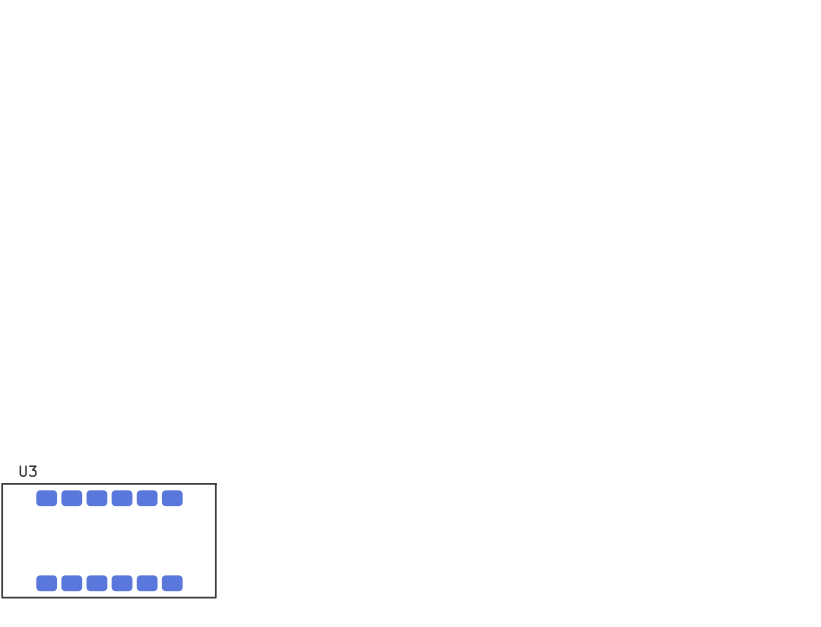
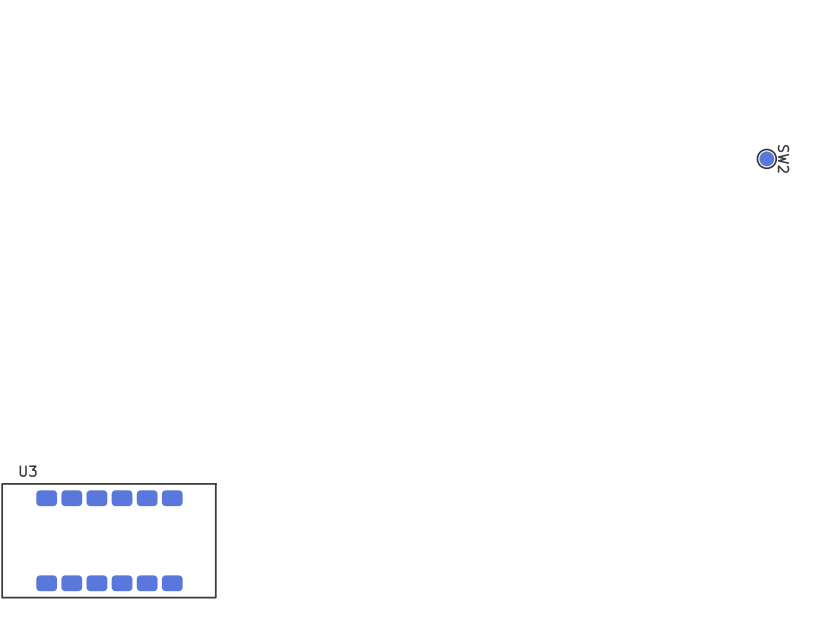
SW2: none -> (766, 158)

